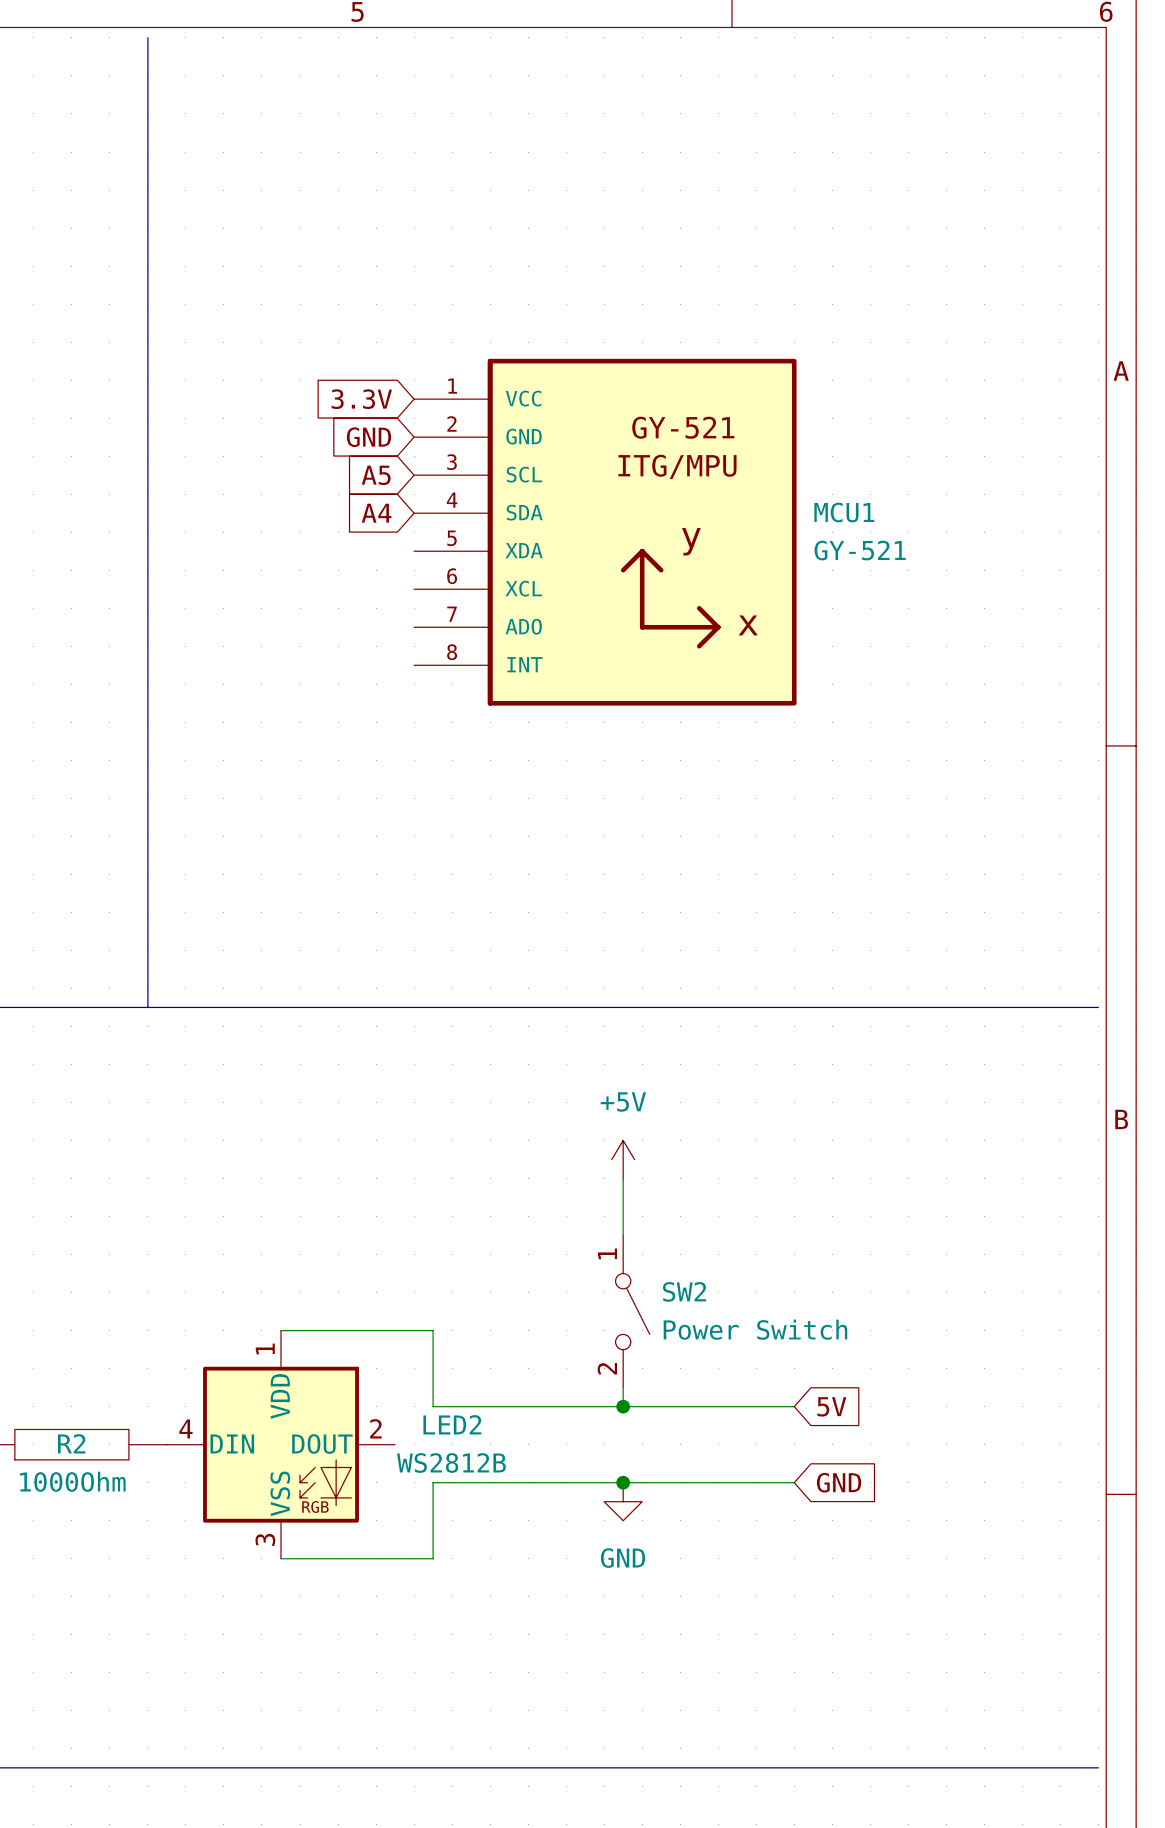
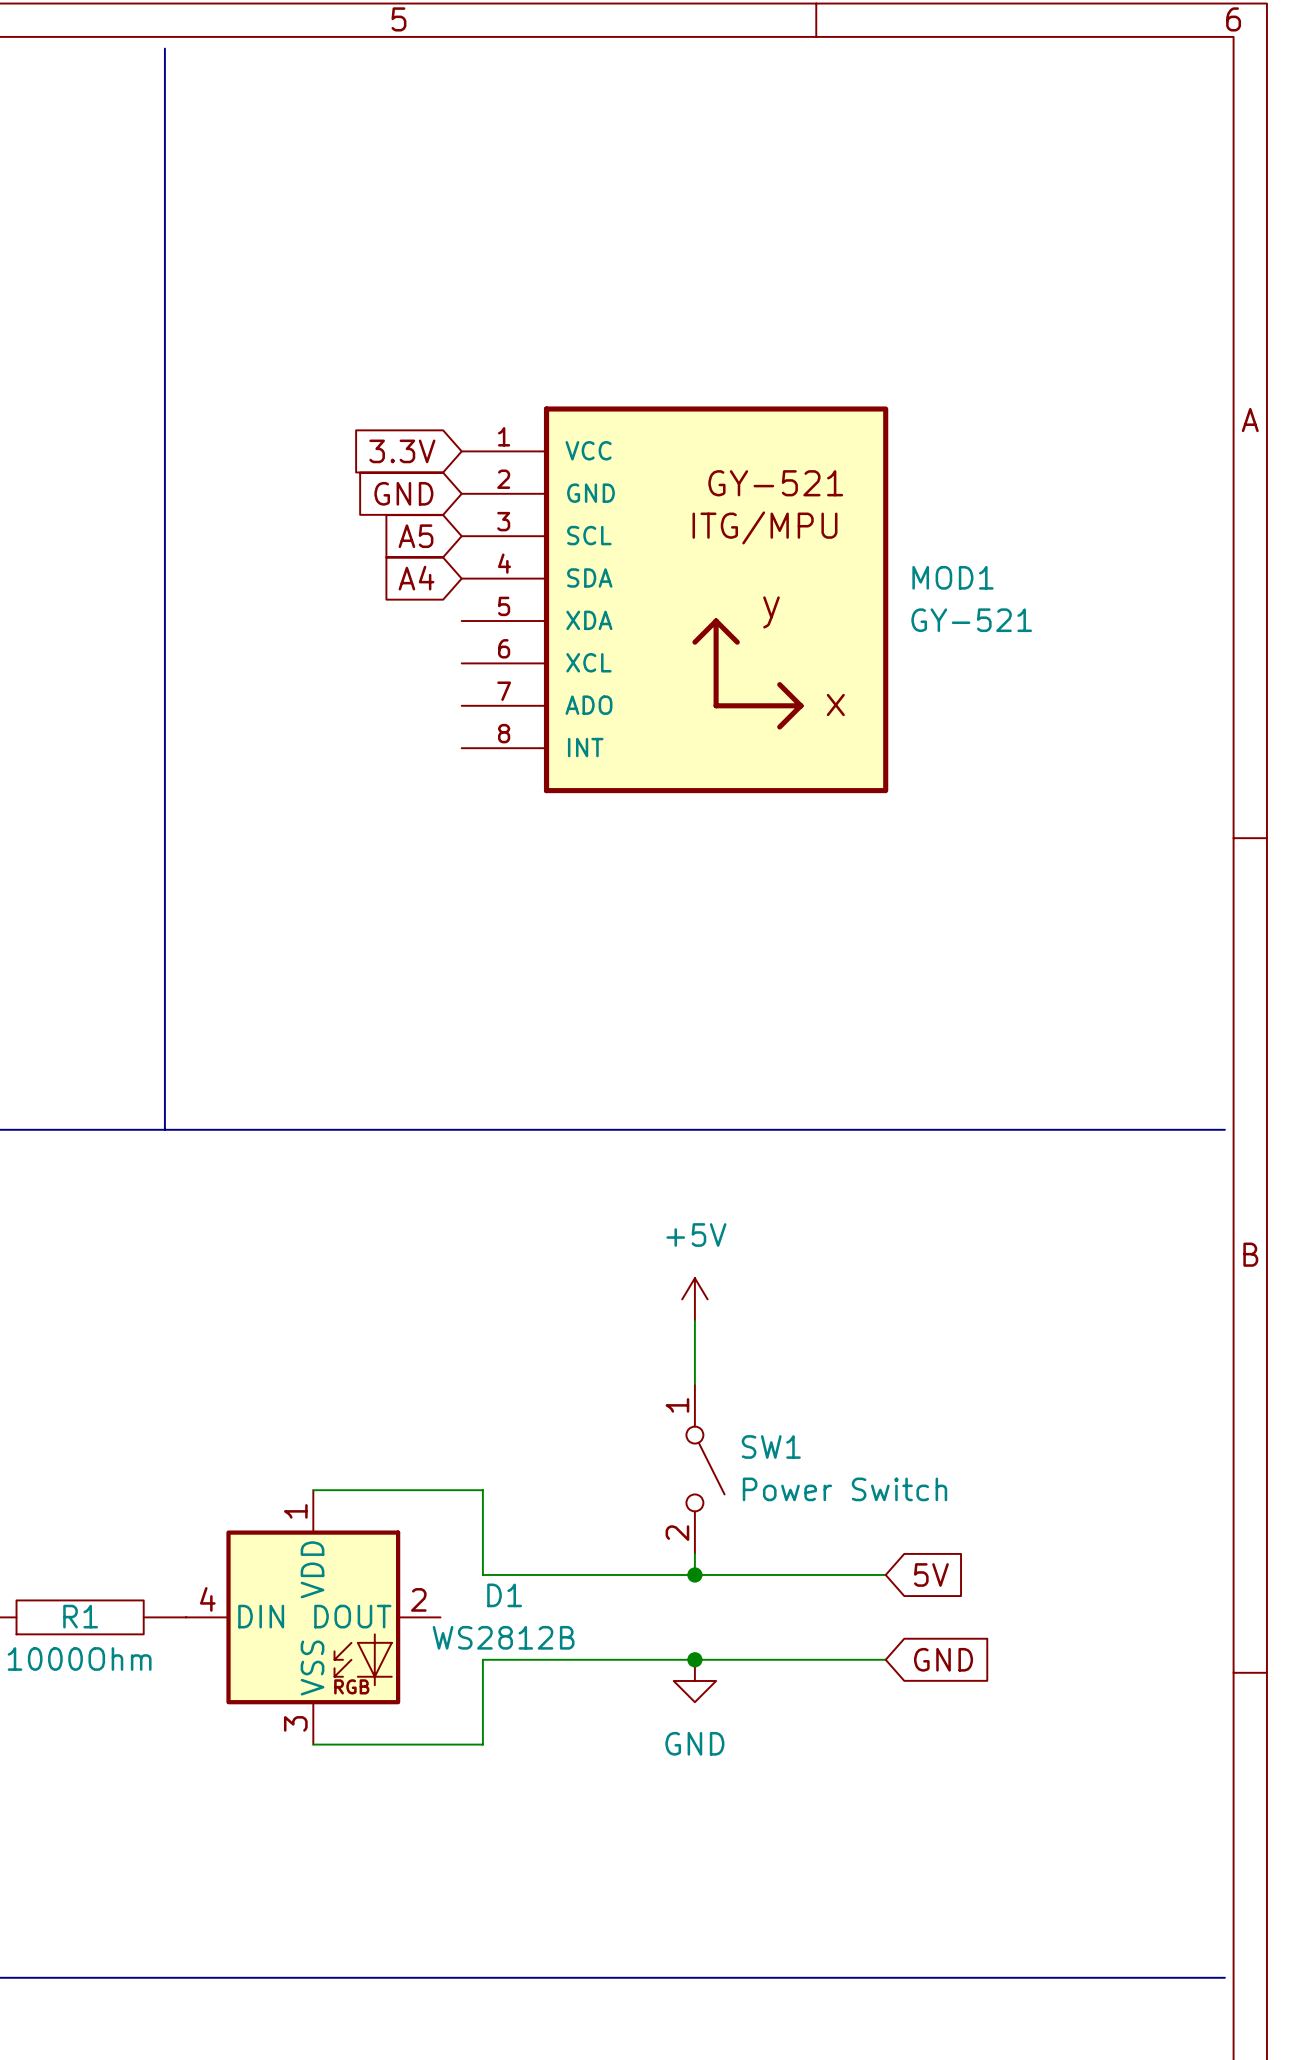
MCU1 name: MCU1 (844, 512) -> MOD1 (953, 577)
SW2 name: SW2 (684, 1291) -> SW1 (771, 1447)
LED2 name: LED2 (452, 1424) -> D1 (504, 1595)
R2 name: R2 (71, 1443) -> R1 (80, 1616)

